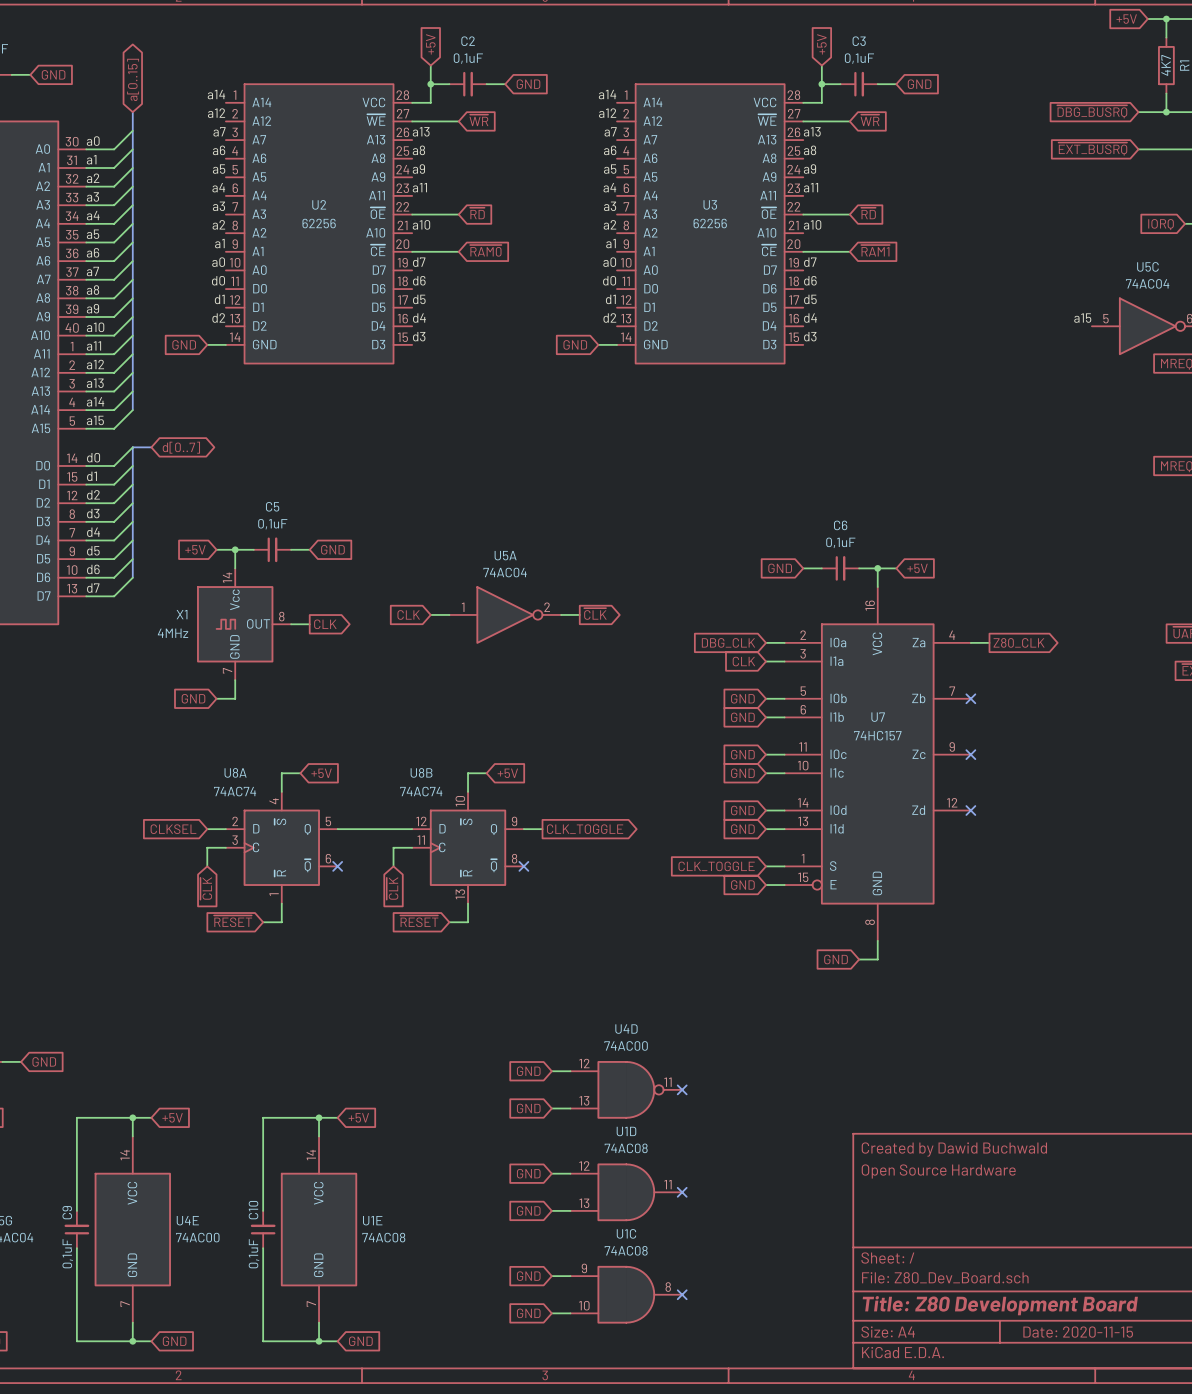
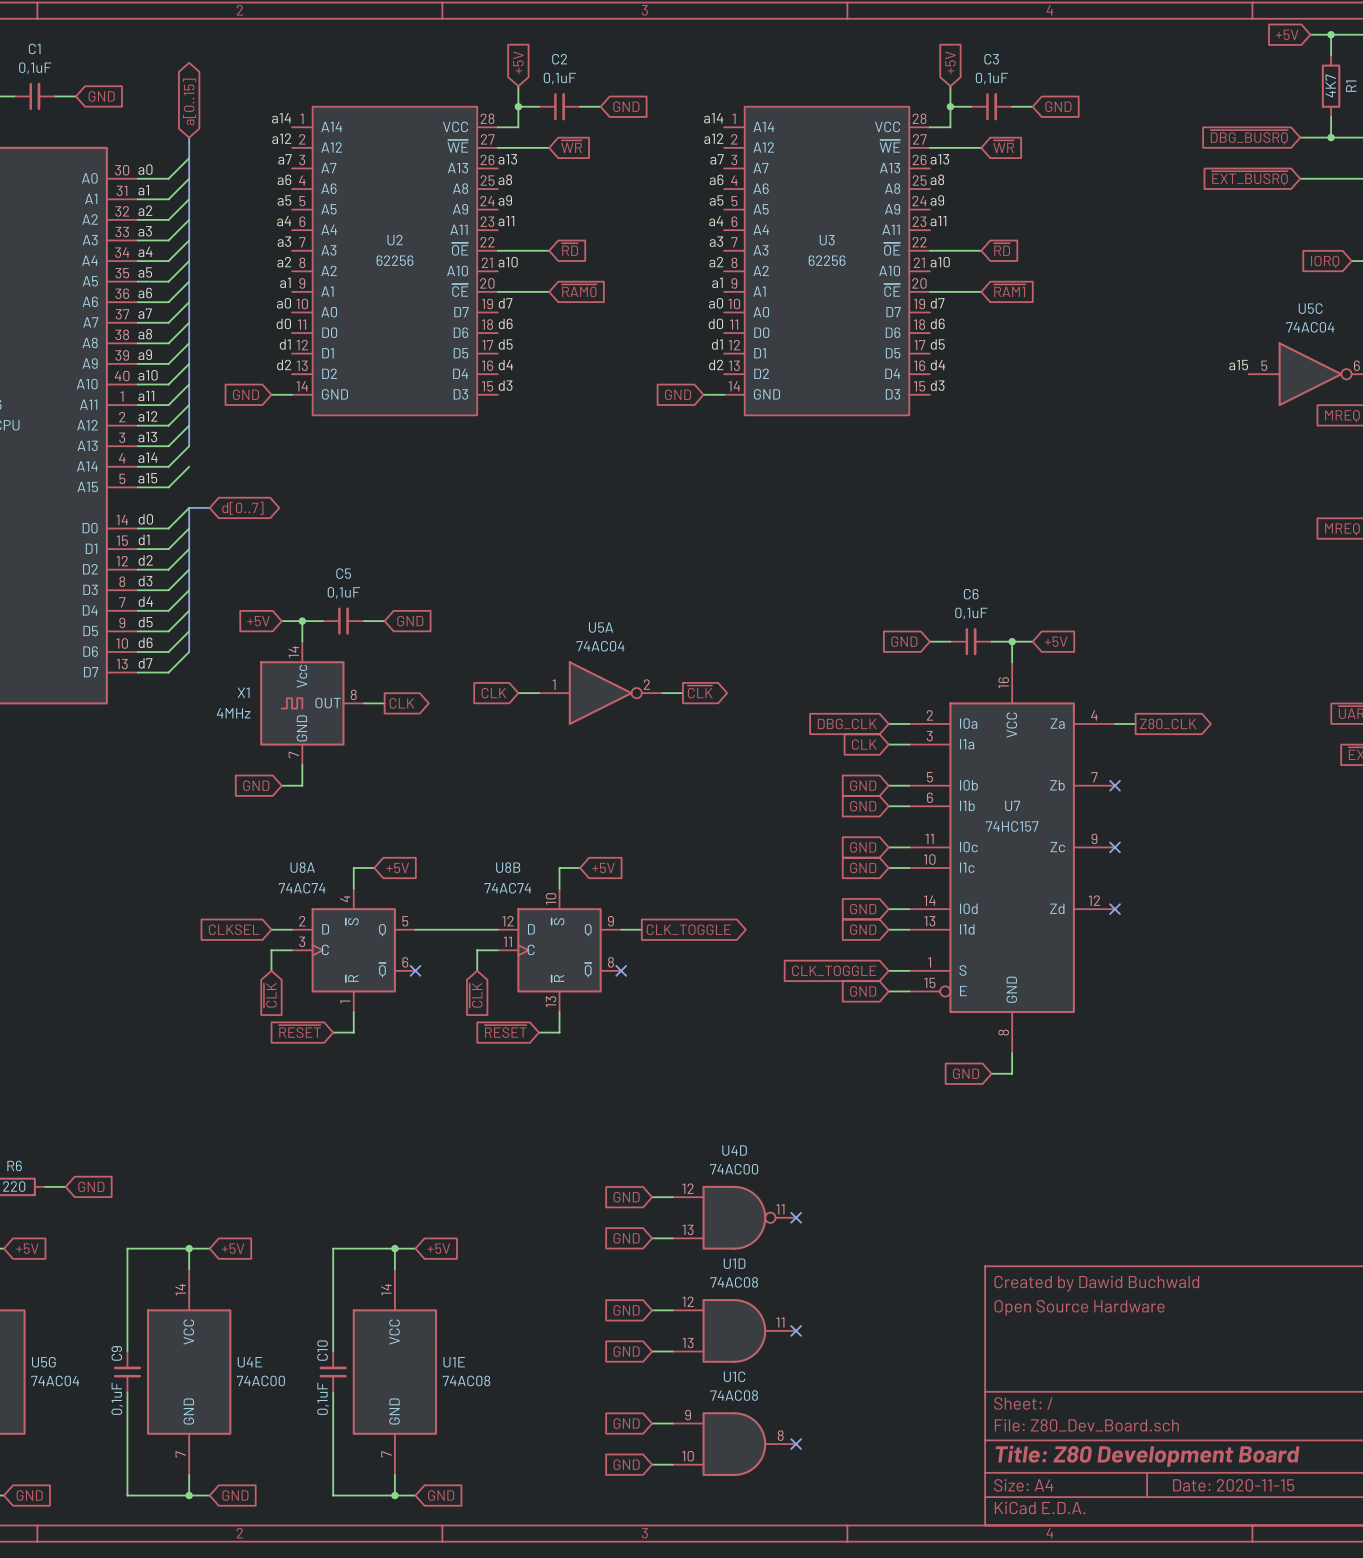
bus: (132, 391) (132, 410) -> none

